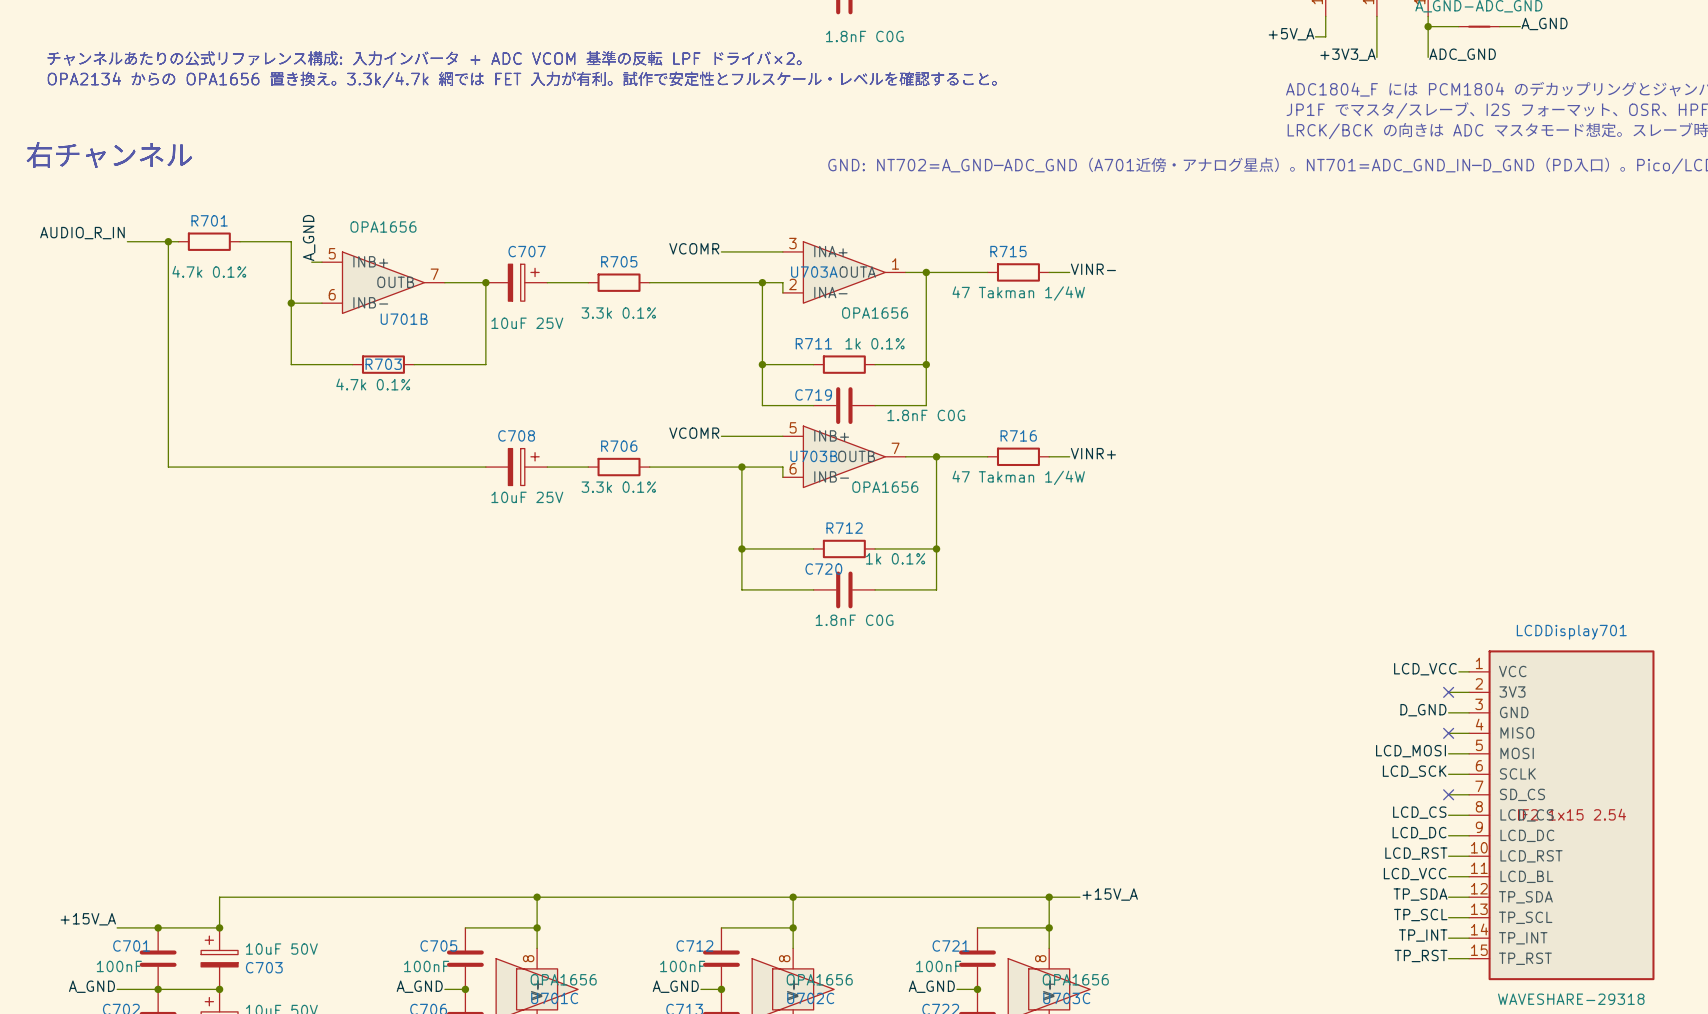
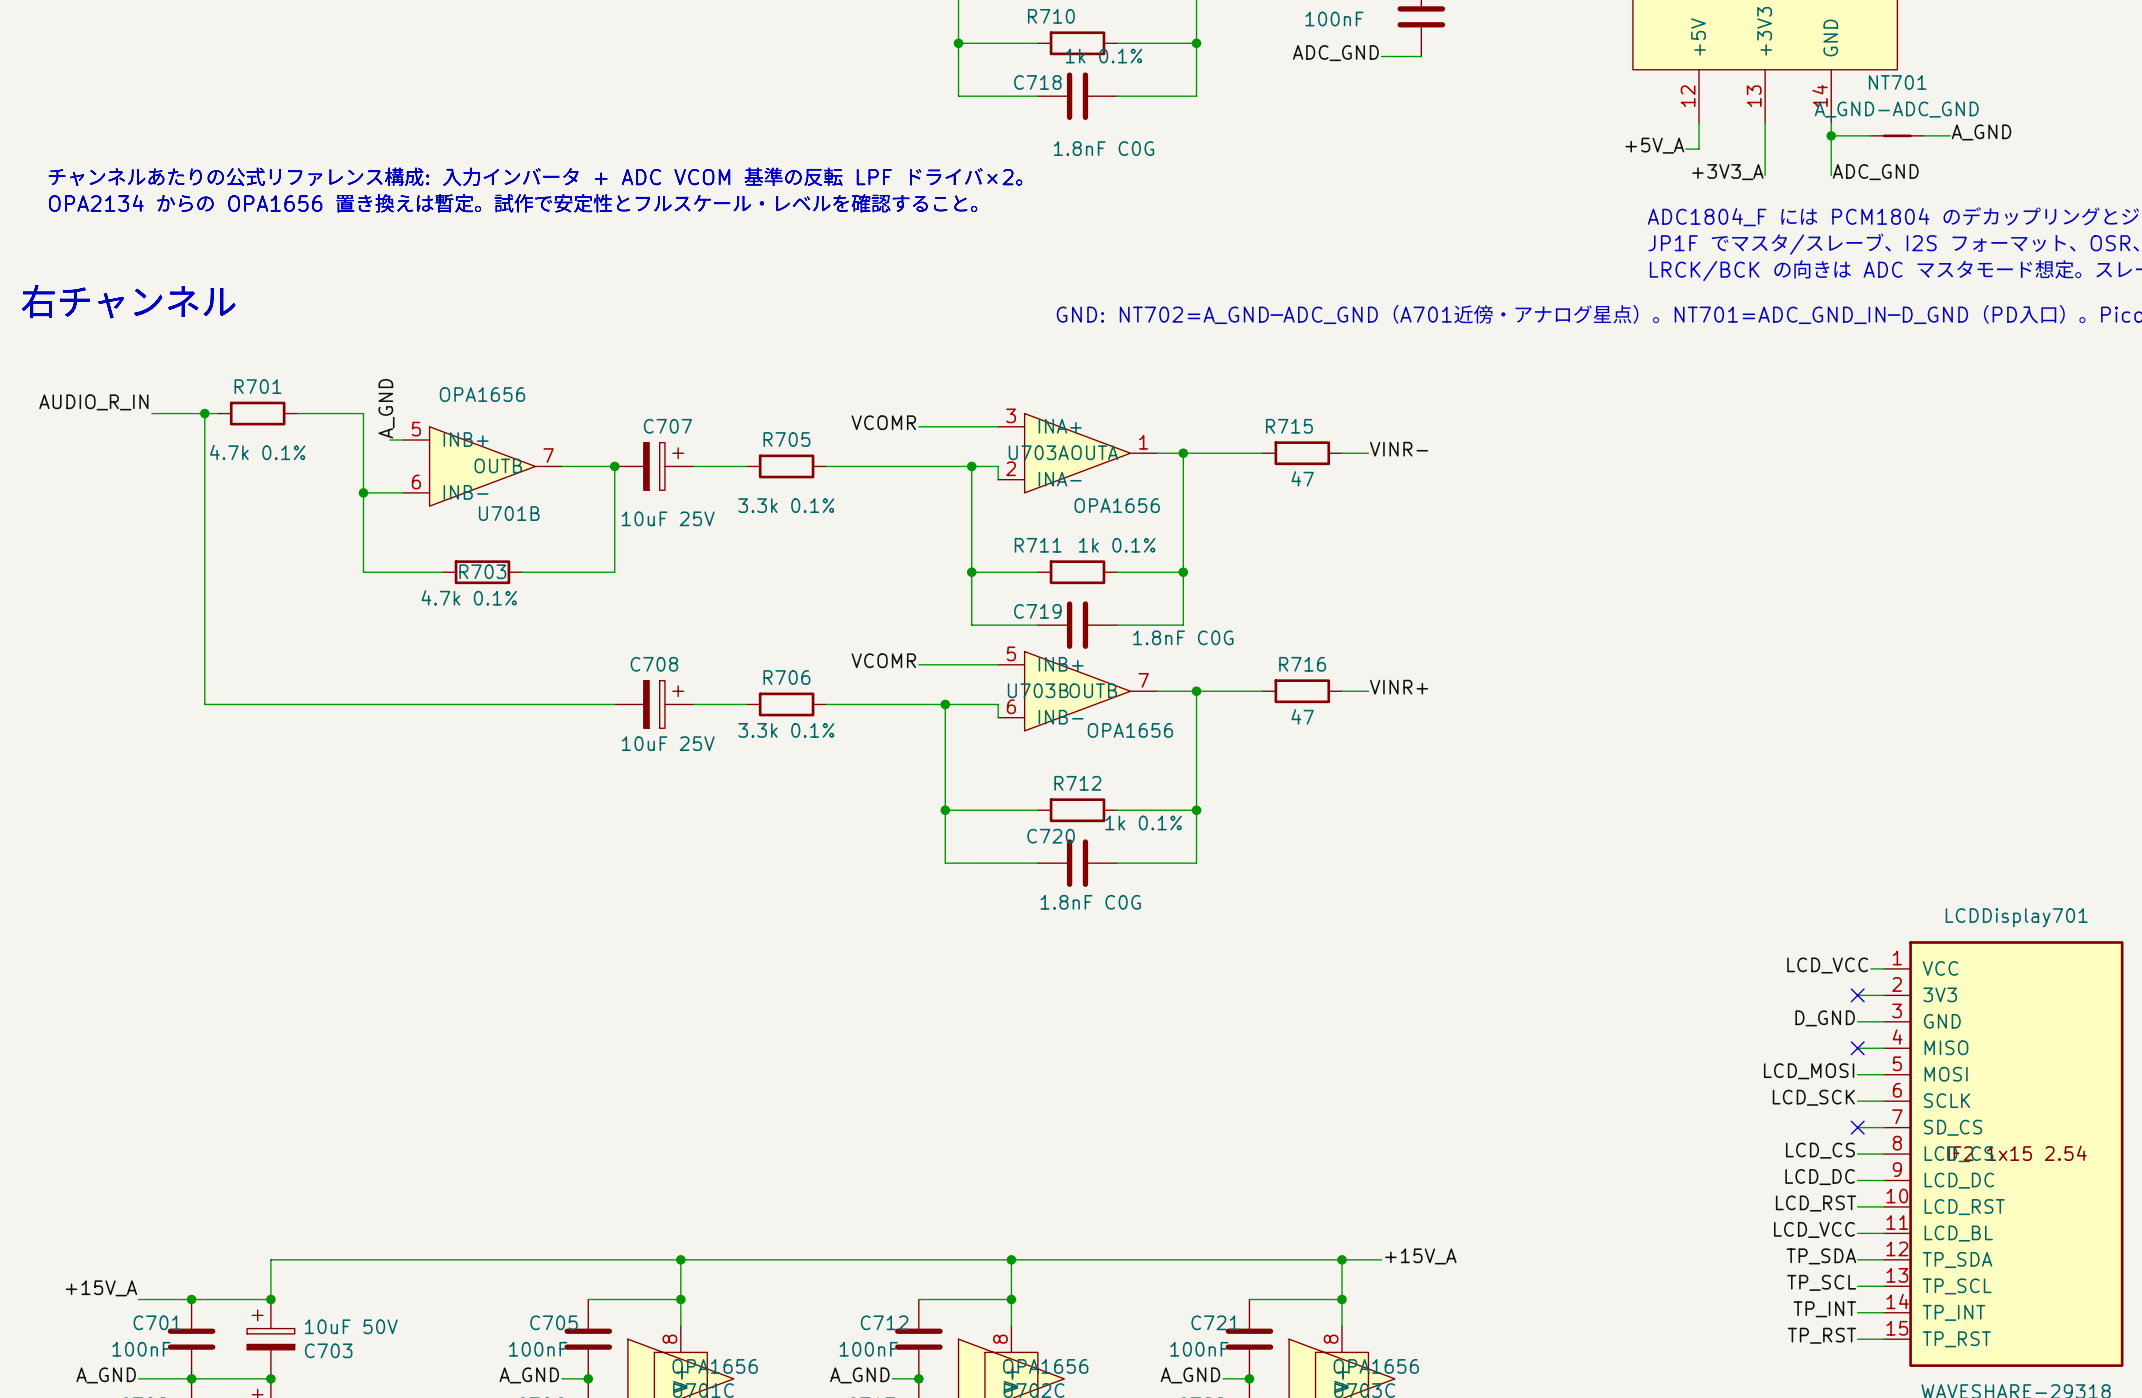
text: OPA2134 からの OPA1656 置き換え。3.3k/4.7k 網では FET 入力が有利。試作で安定性とフルスケール・レベルを確認すること。 (522, 79) -> OPA2134 からの OPA1656 置き換えは暫定。試作で安定性とフルスケール・レベルを確認すること。 (513, 203)
R715 value: 47 Takman 1/4W (1018, 293) -> 47 (1302, 478)
R716 value: 47 Takman 1/4W (1018, 477) -> 47 (1302, 716)

